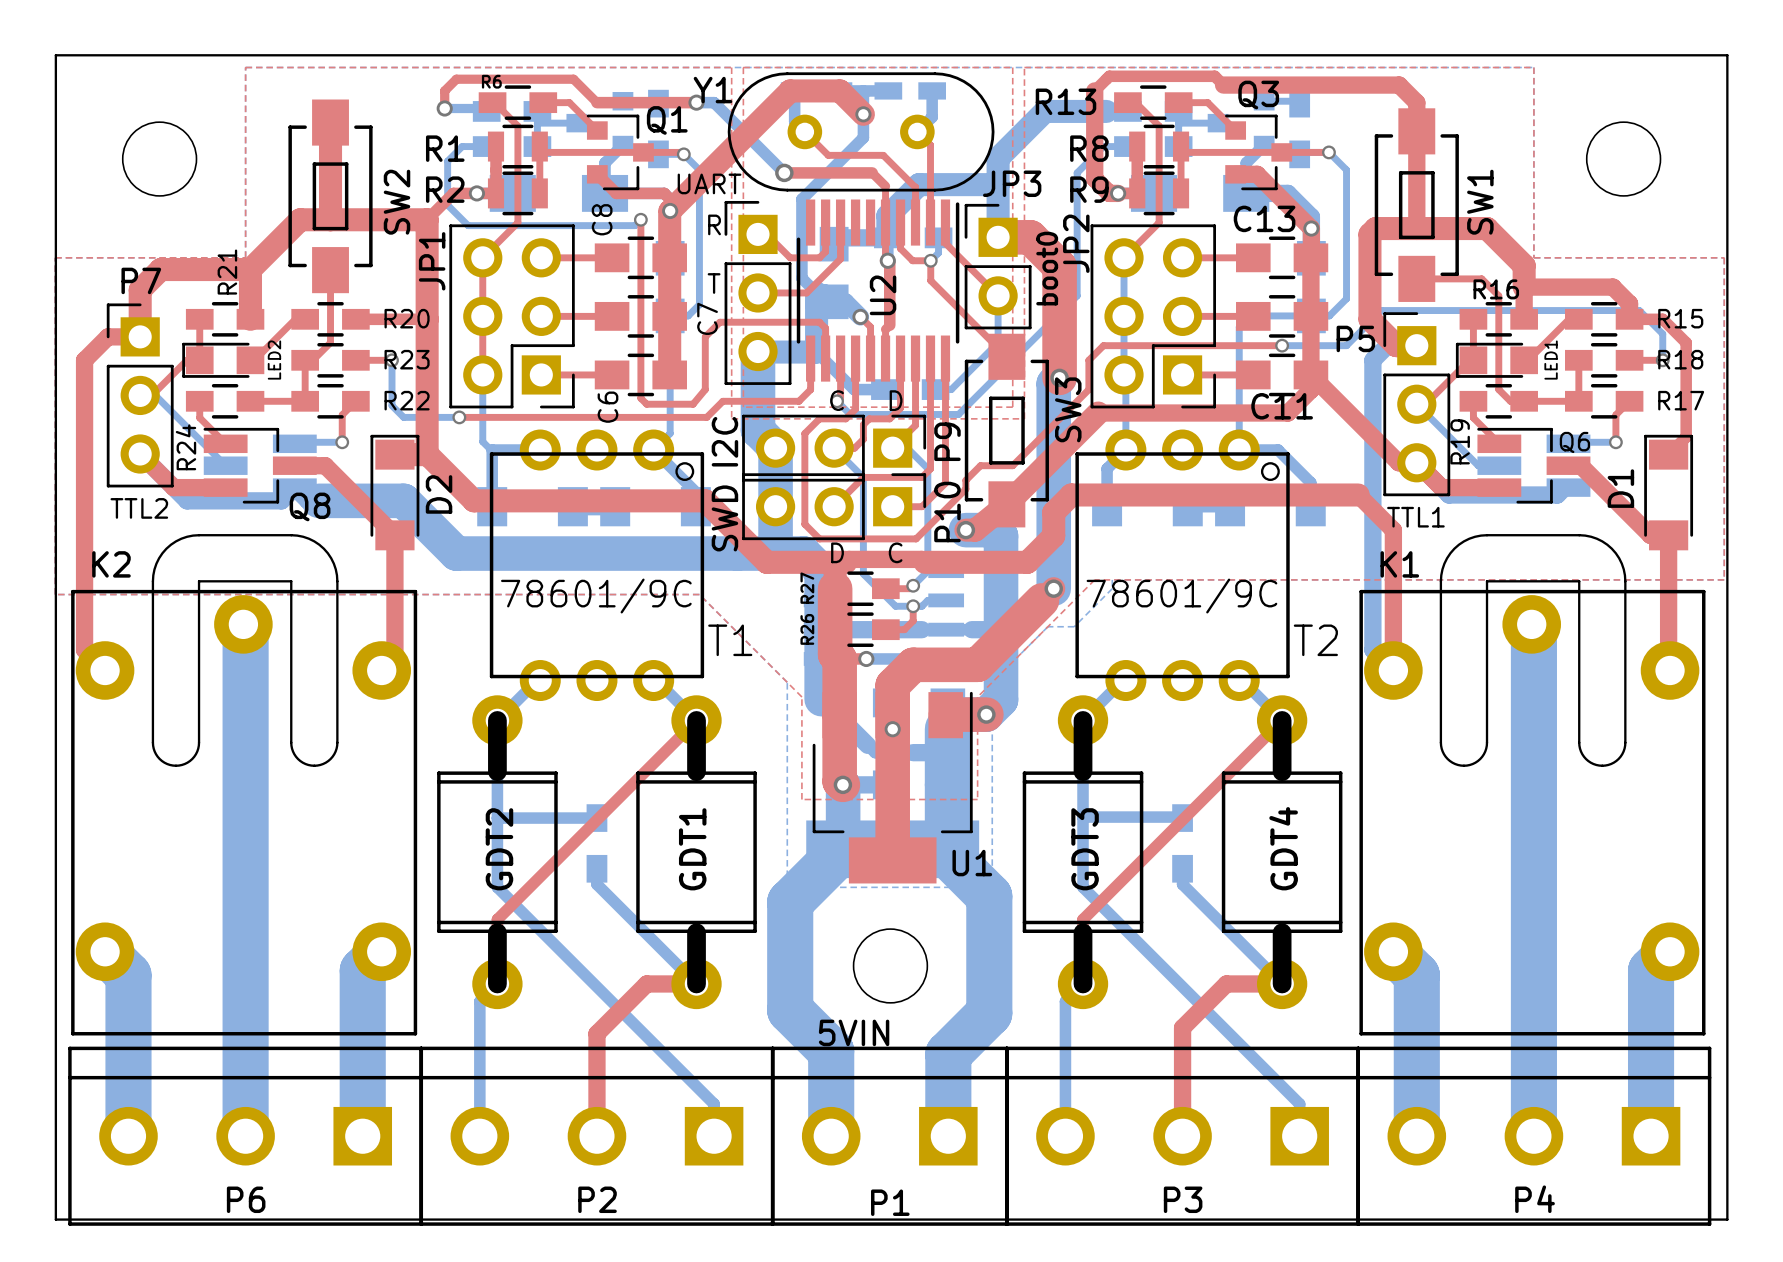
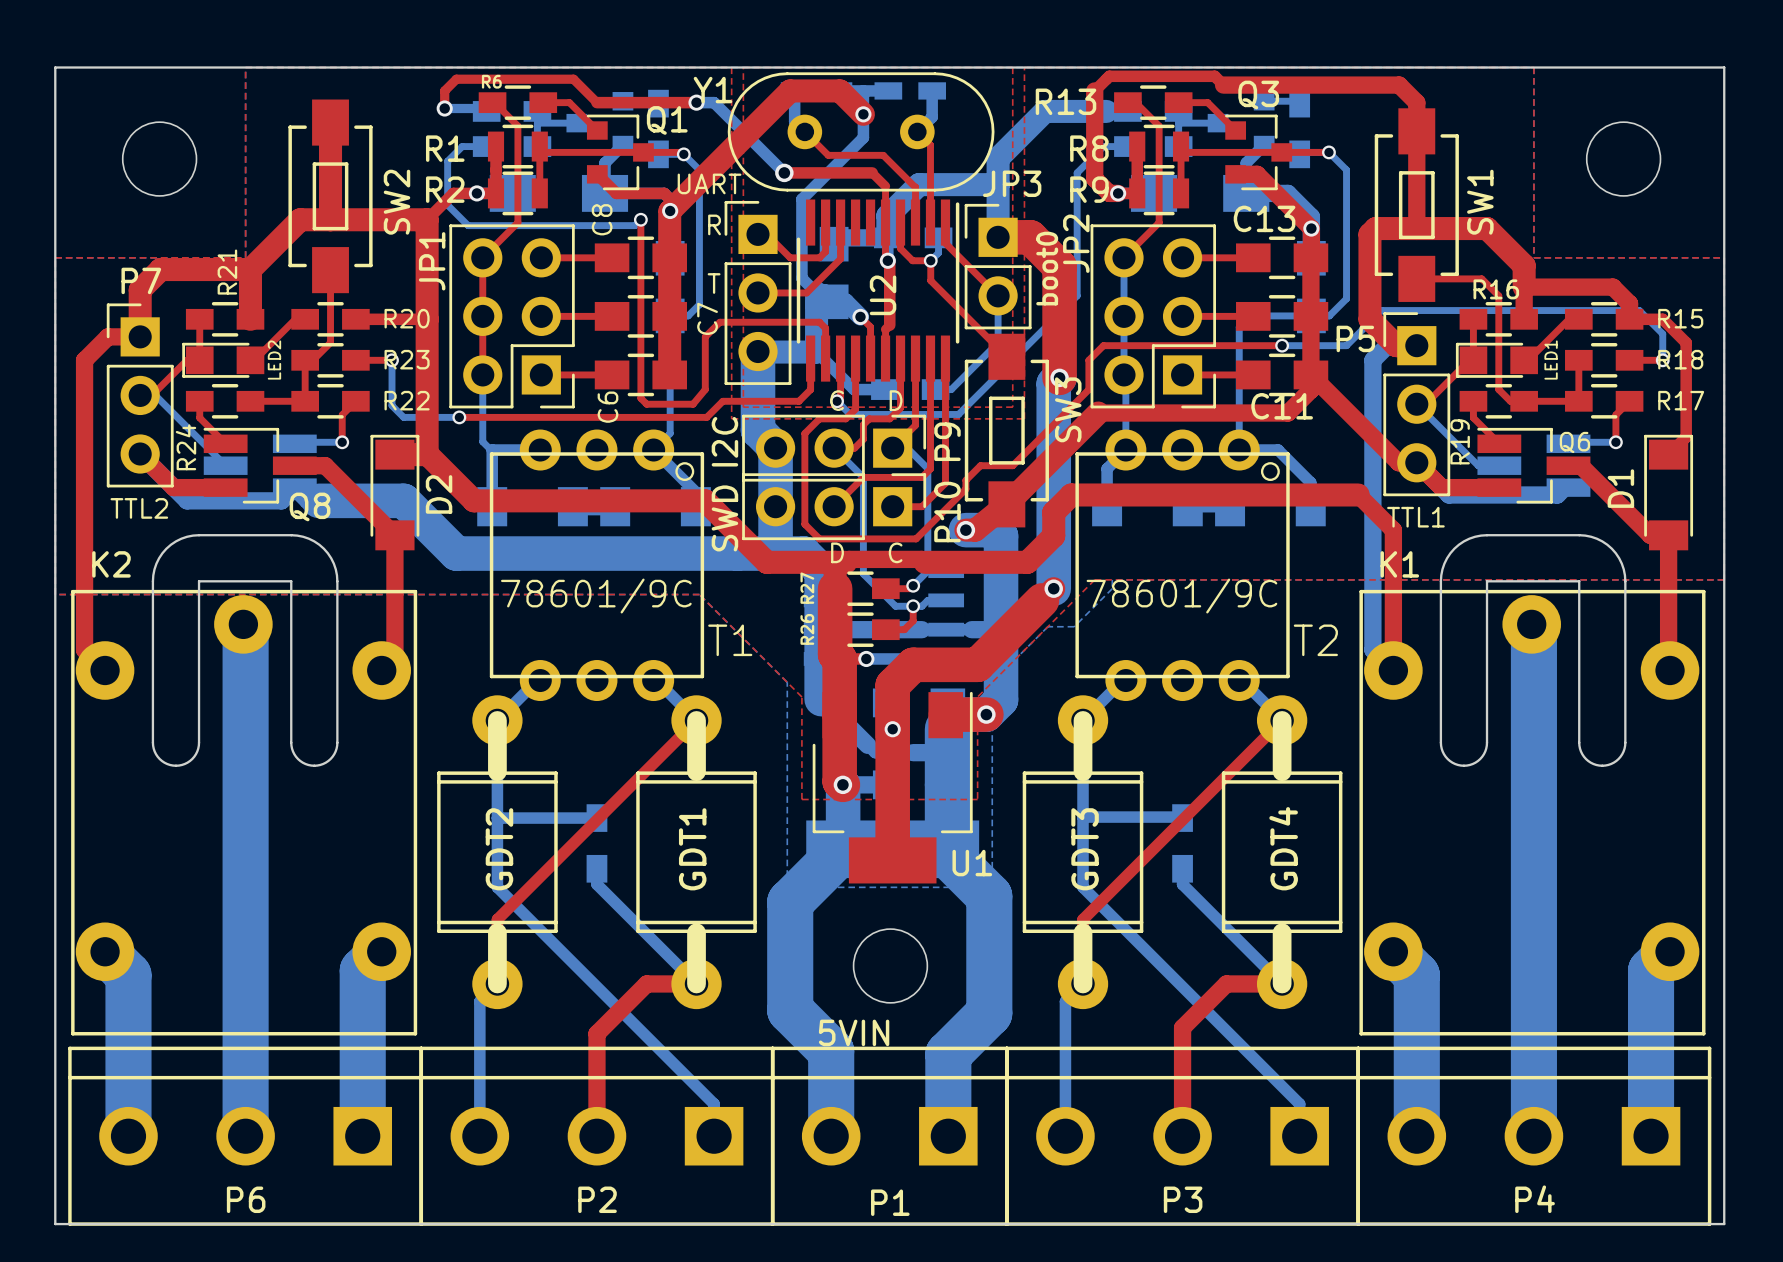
board edge: (55, 55) (1727, 55) (1727, 1219) (55, 1219) (55, 55) -> (55, 67) (55, 1224) (1724, 1224) (1724, 67) (55, 67)

